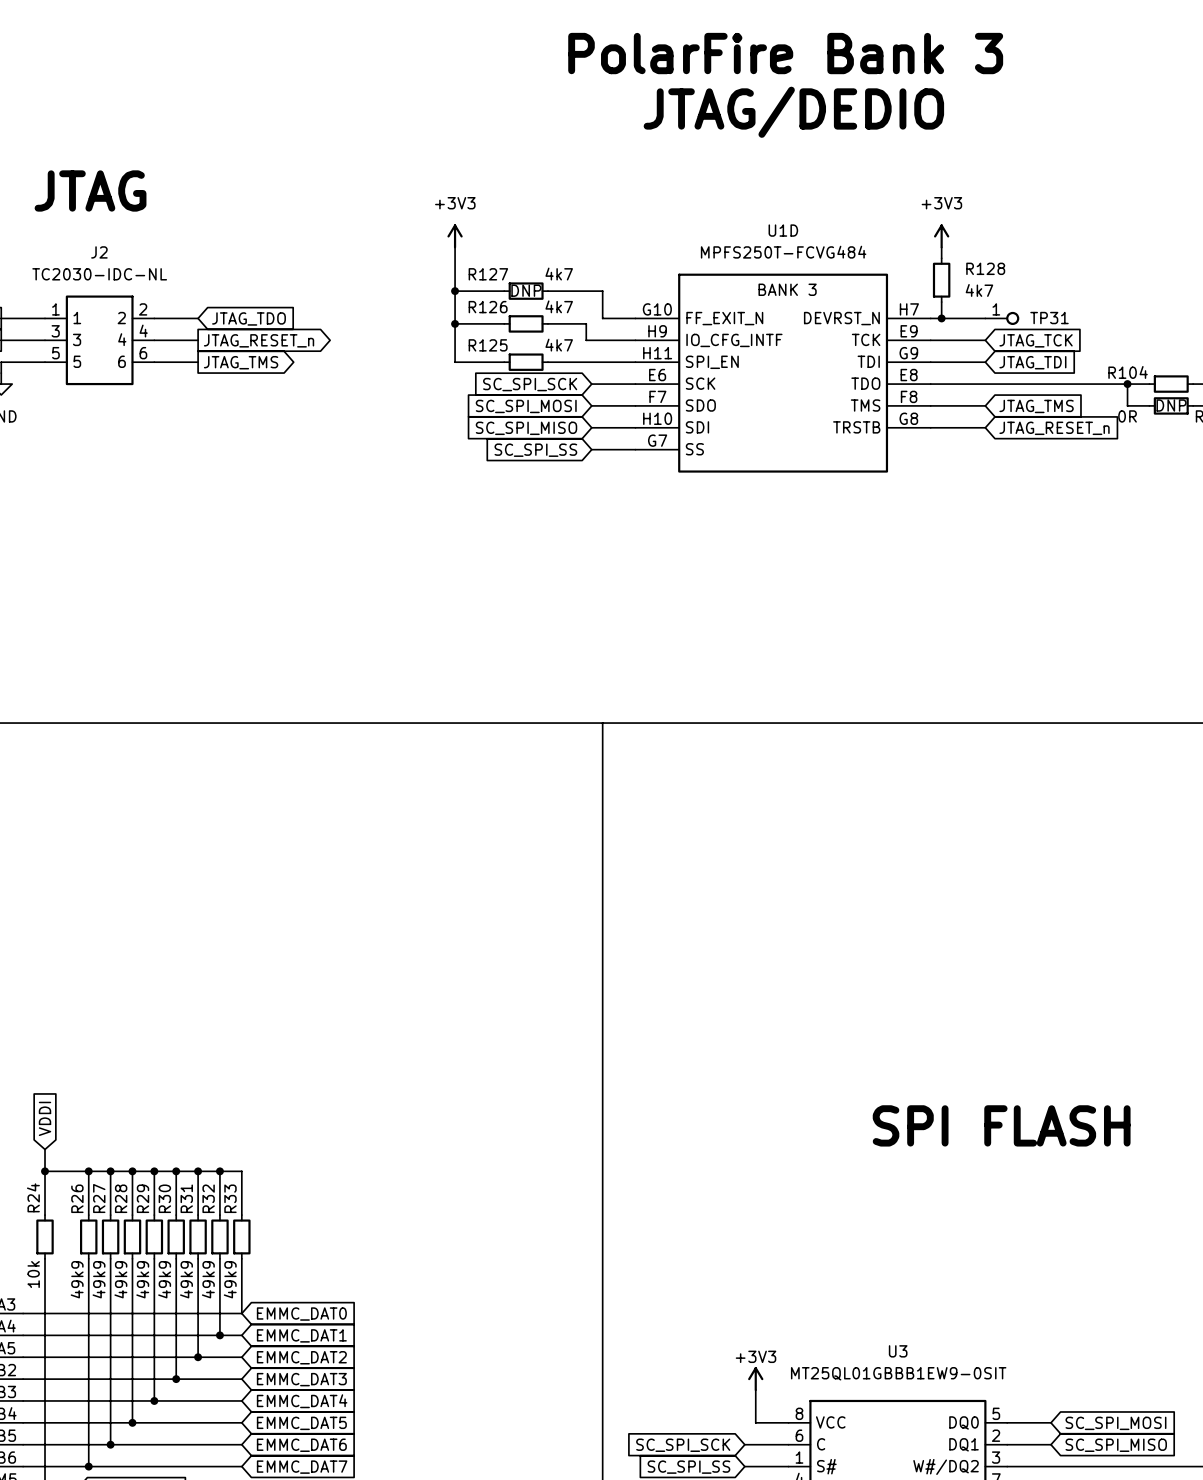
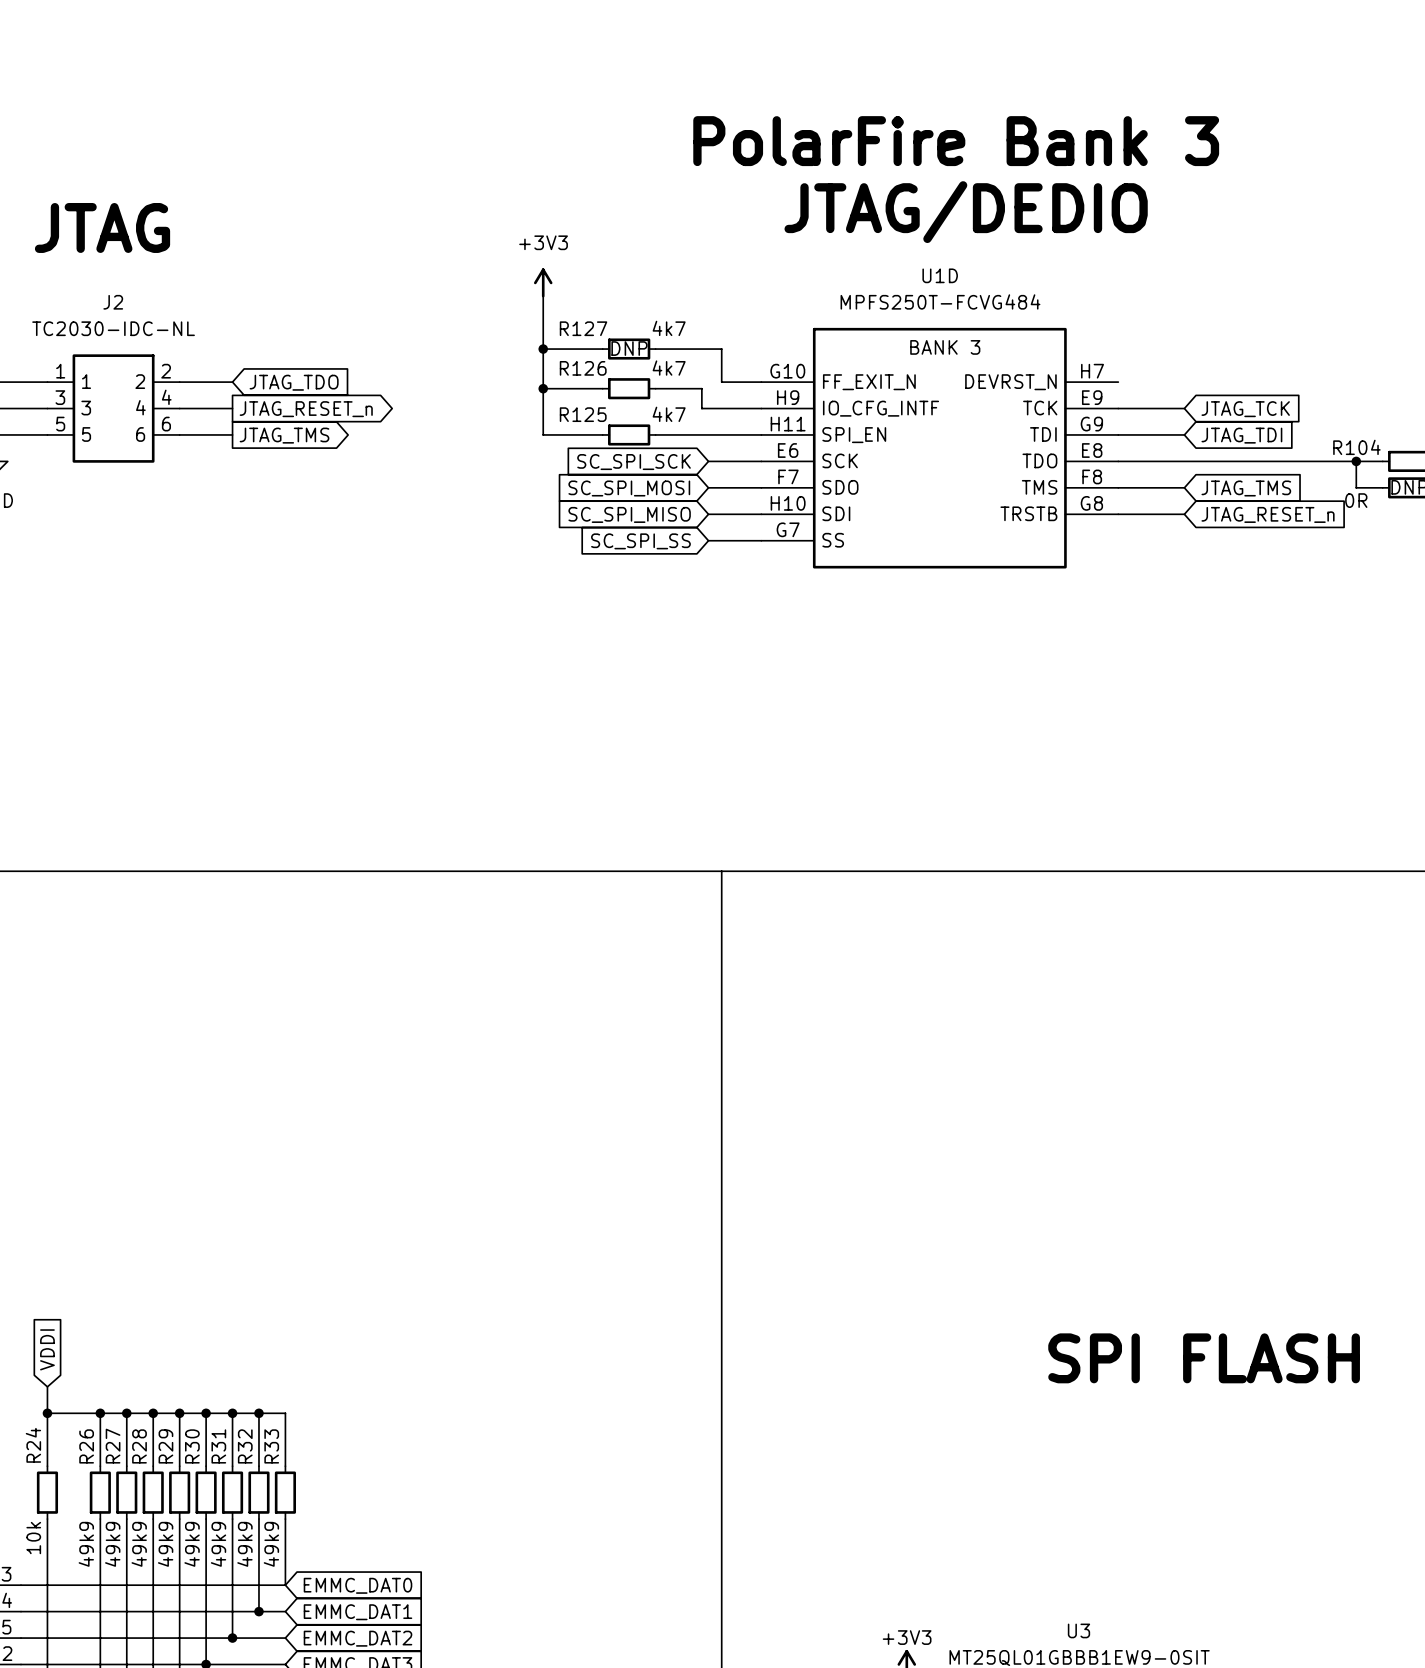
text position: PolarFire Bank 3 (785, 53) -> PolarFire Bank 3 (956, 141)
text position: JTAG/DEDIO (793, 112) -> JTAG/DEDIO (966, 212)
power symbol: +3V3 (941, 236) -> none
wire: (941, 247) (941, 258) -> none
R128: (941, 280) -> none
wire: (941, 302) (941, 318) -> none
wire: (930, 318) (985, 318) -> none
junction: (941, 318) -> none
TP31: (1002, 318) -> none

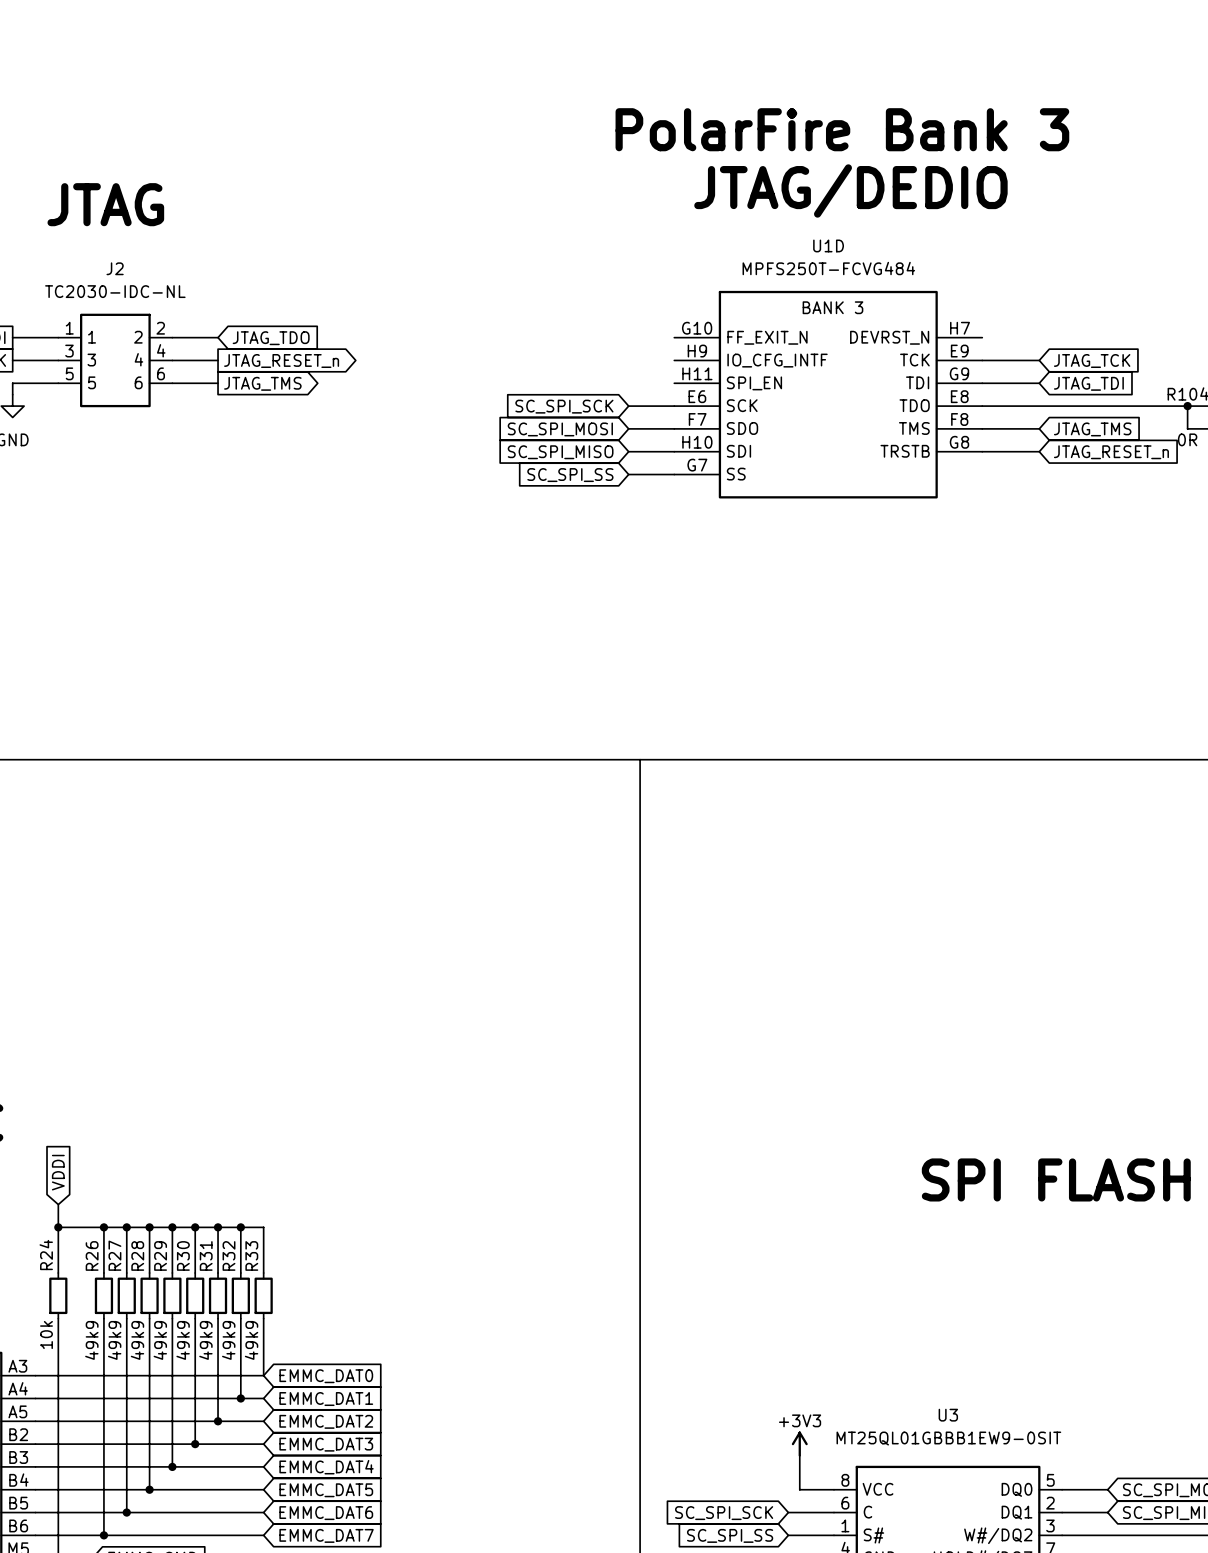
power symbol: +3V3 (543, 282) -> none
wire: (543, 296) (543, 434) (602, 434) -> none
wire: (543, 349) (602, 349) -> none
junction: (543, 349) -> none
R127: (629, 349) -> none
wire: (655, 349) (721, 349) (721, 382) (761, 382) -> none
wire: (543, 388) (602, 388) -> none
junction: (543, 388) -> none
R126: (629, 388) -> none
wire: (655, 388) (701, 388) (701, 408) (761, 408) -> none
R125: (629, 434) -> none
wire: (655, 434) (761, 434) -> none

